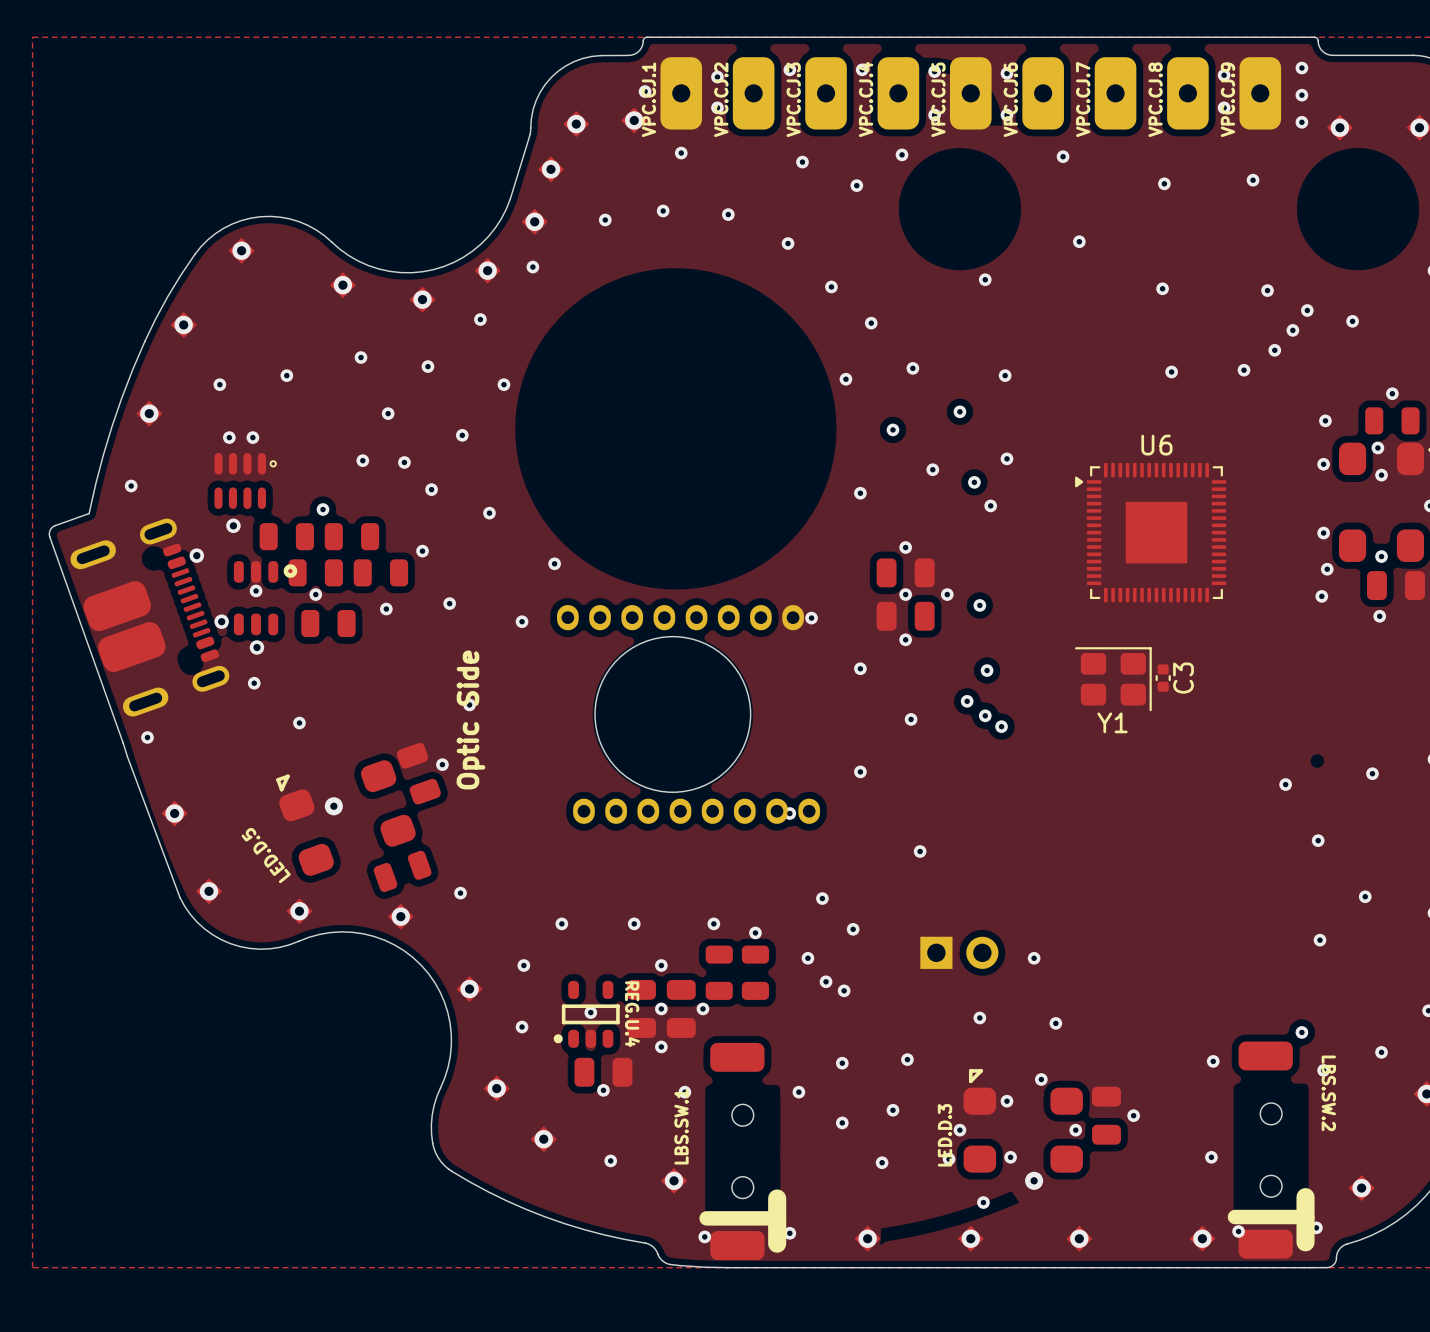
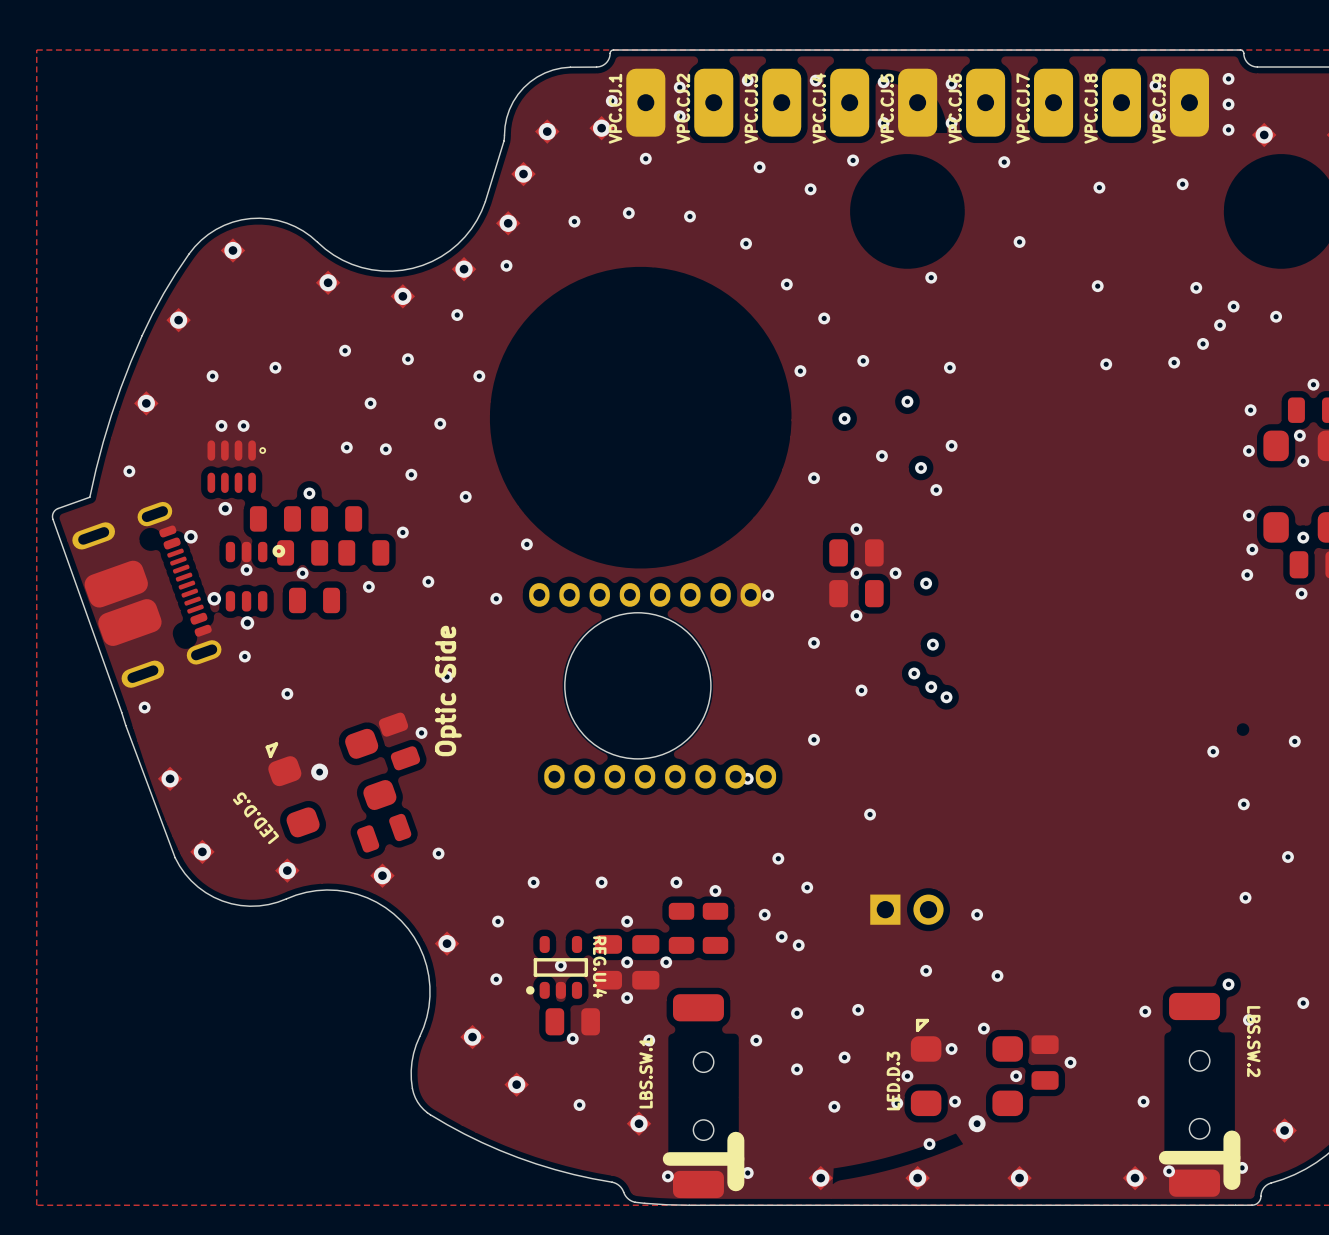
U6: (1150, 532) -> none
C3: (1163, 678) -> none
Y1: (1113, 679) -> none

